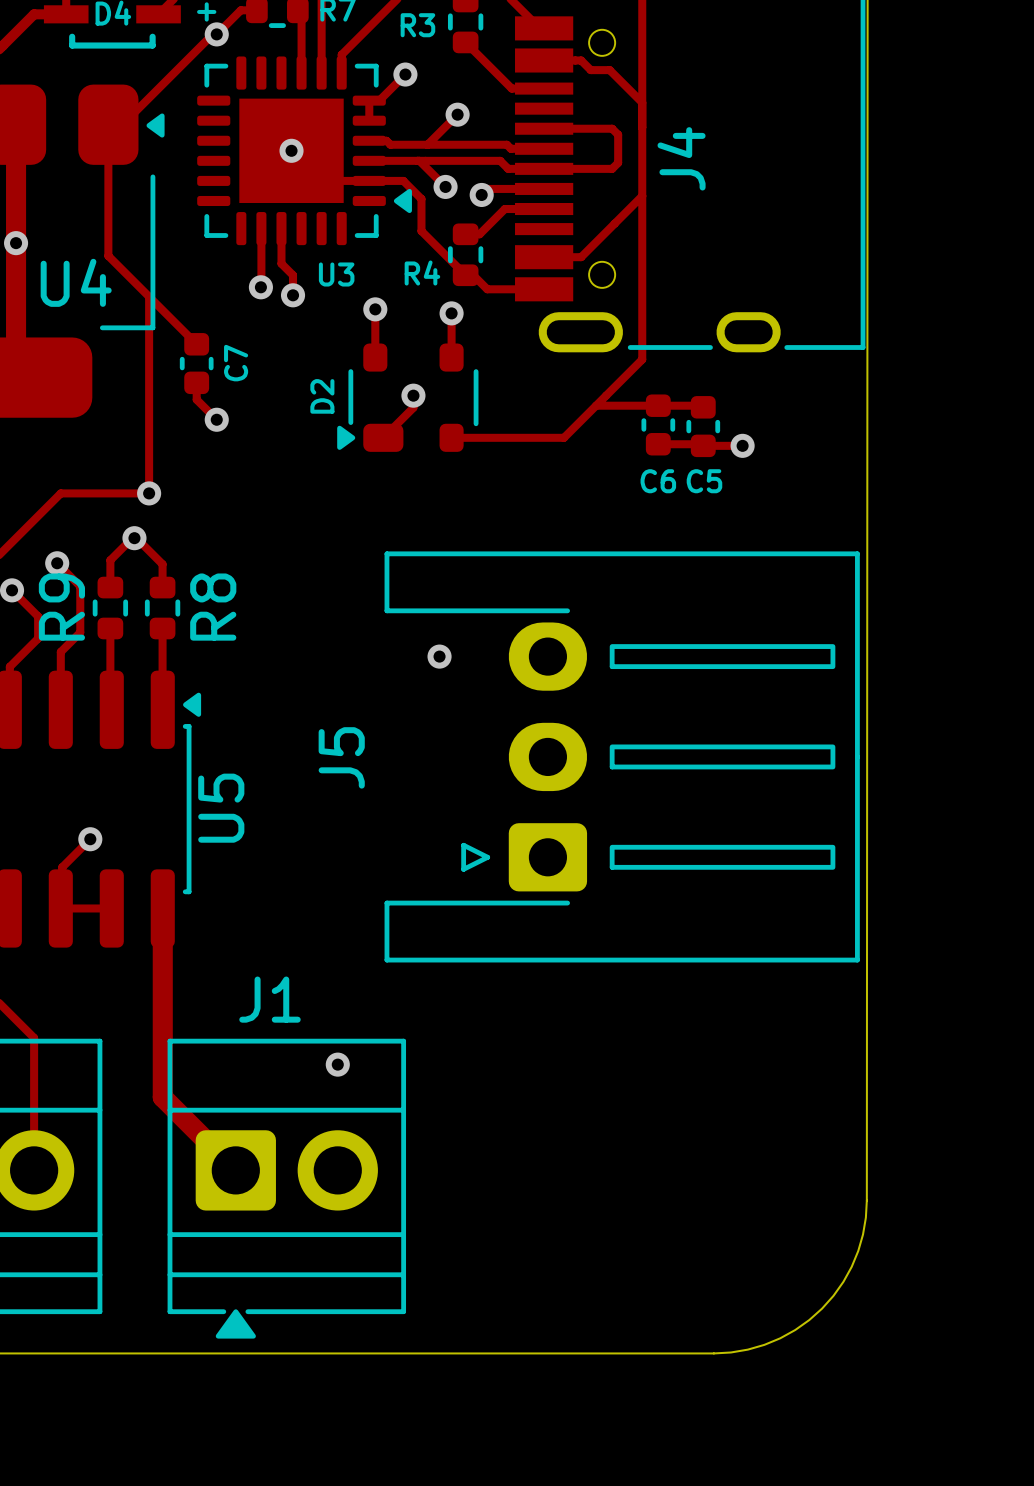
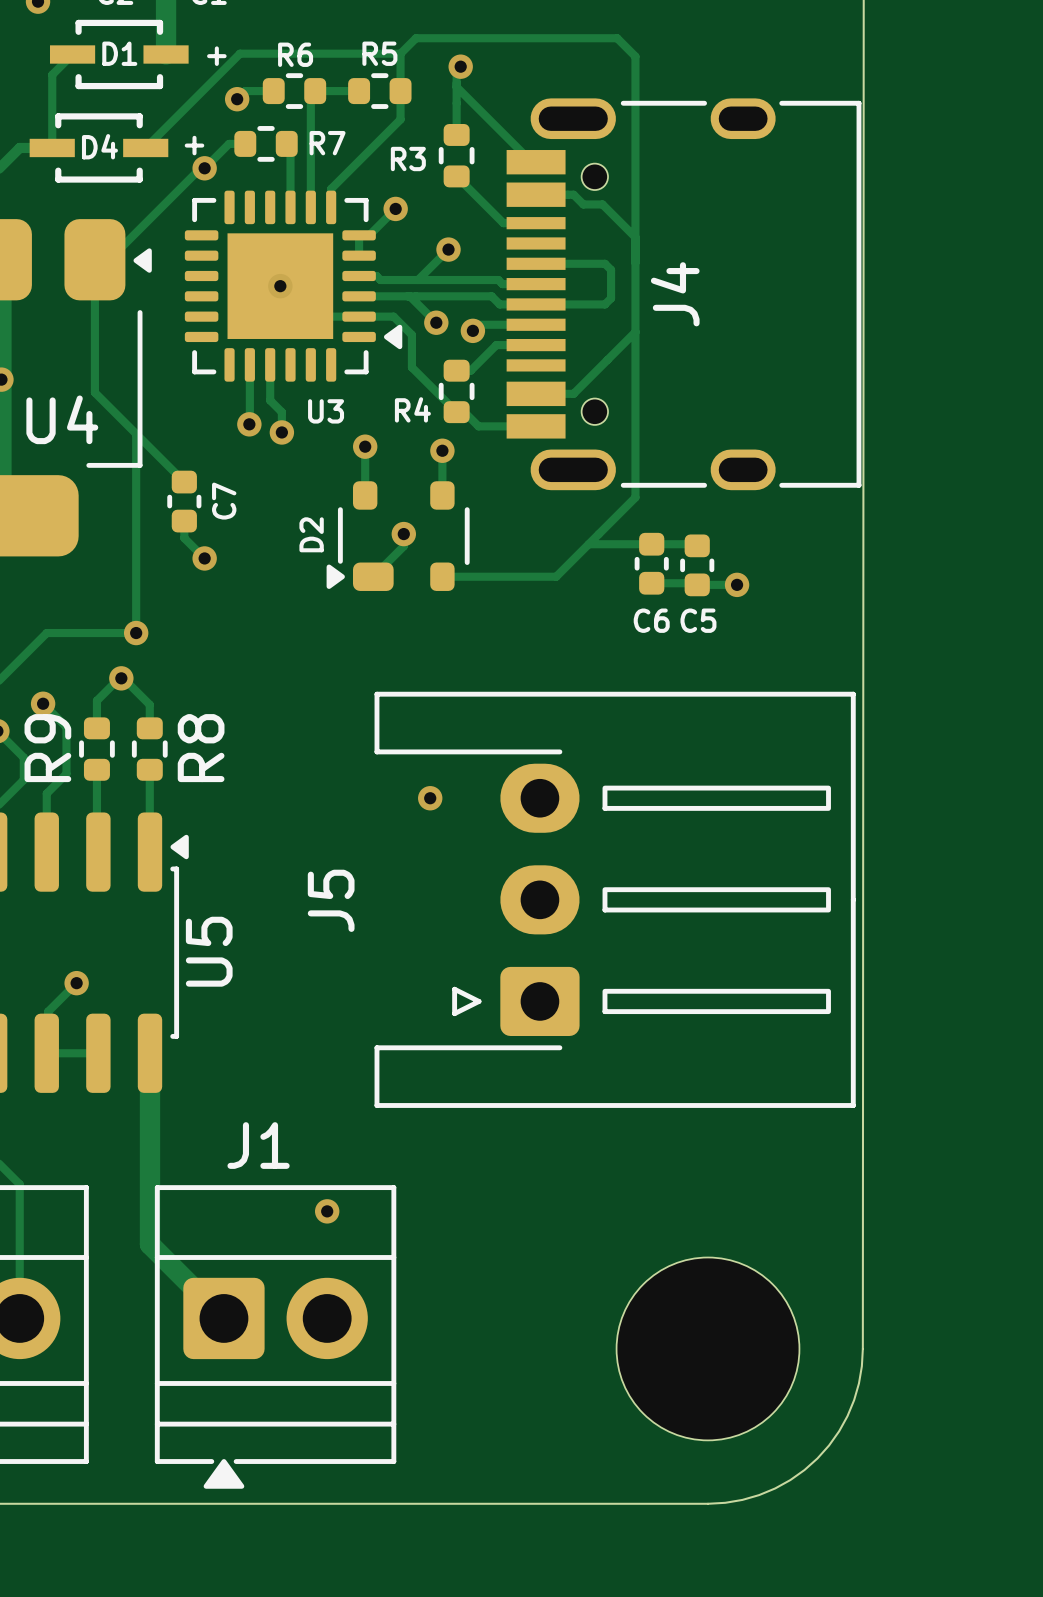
part: none -> (708, 1348)

